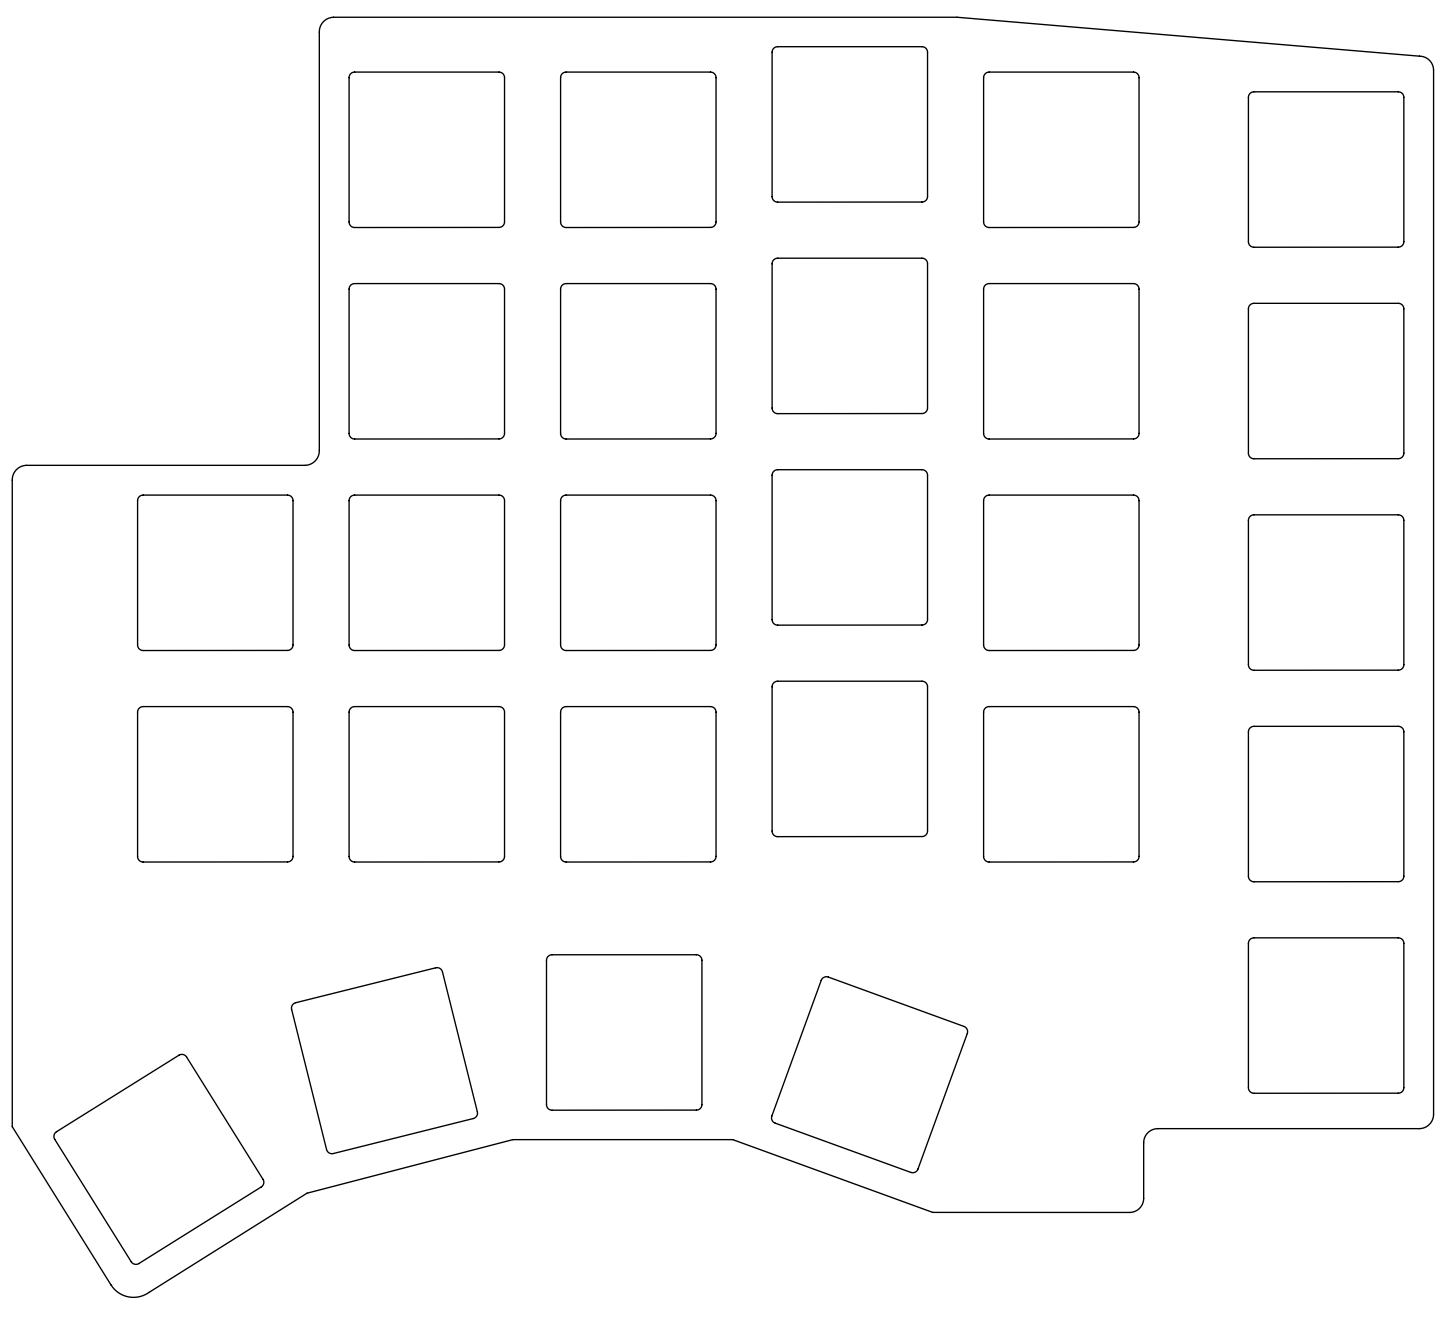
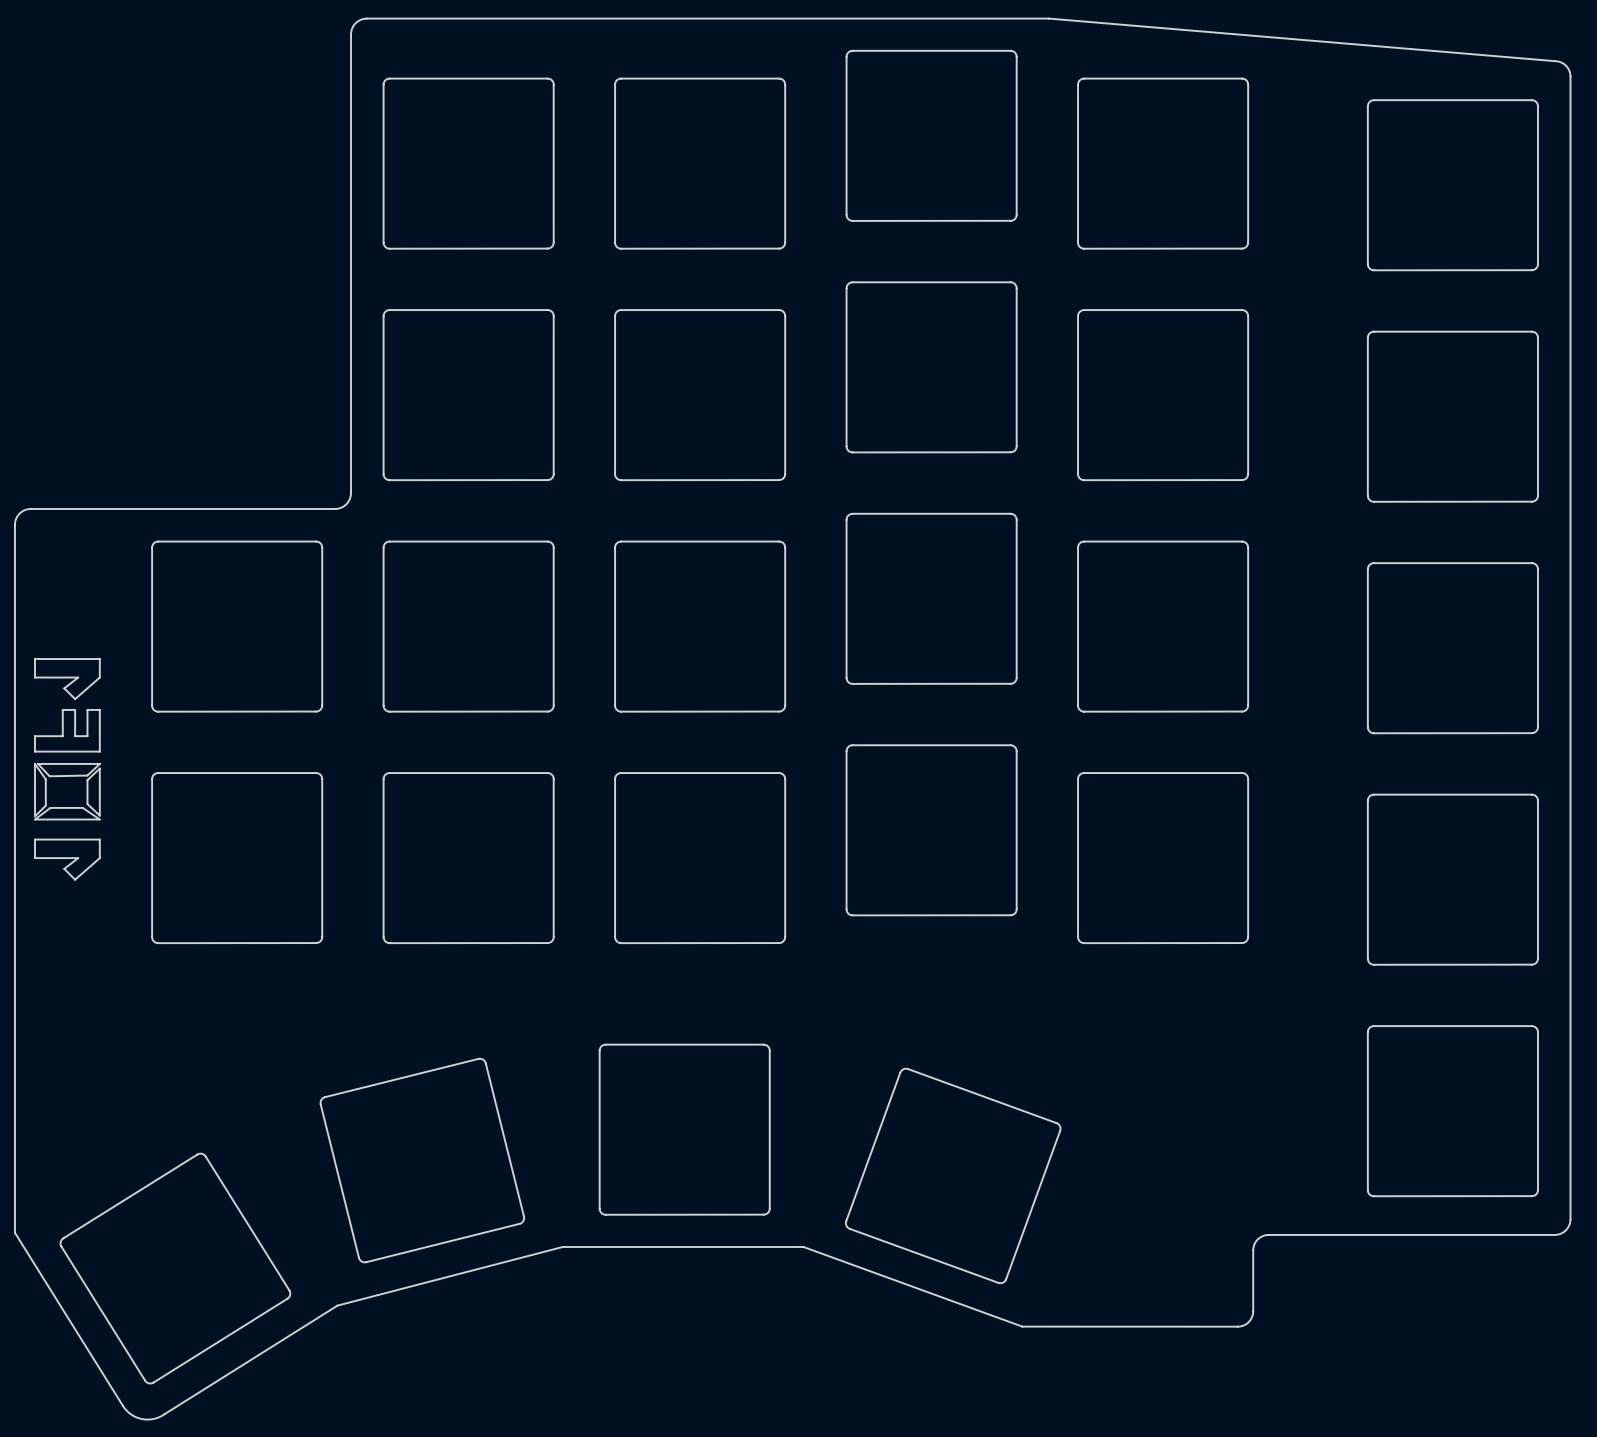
board edge: none -> (99, 659) (99, 677) (75, 699) (64, 688) (78, 677) (35, 677) (35, 659) (99, 659)
board edge: none -> (99, 709) (99, 751) (35, 751) (35, 736) (62, 736) (62, 709) (75, 709) (75, 736) (87, 736) (87, 709) (99, 709)
board edge: none -> (35, 763) (35, 816) (45, 805) (45, 779) (35, 763)
board edge: none -> (99, 763) (38, 763) (49, 776) (87, 775) (99, 763)
board edge: none -> (99, 768) (99, 815) (87, 804) (87, 780) (99, 768)
board edge: none -> (82, 807) (99, 819) (35, 819) (50, 807) (82, 807)
board edge: none -> (99, 839) (99, 858) (75, 879) (64, 868) (78, 858) (35, 858) (35, 839) (99, 839)

